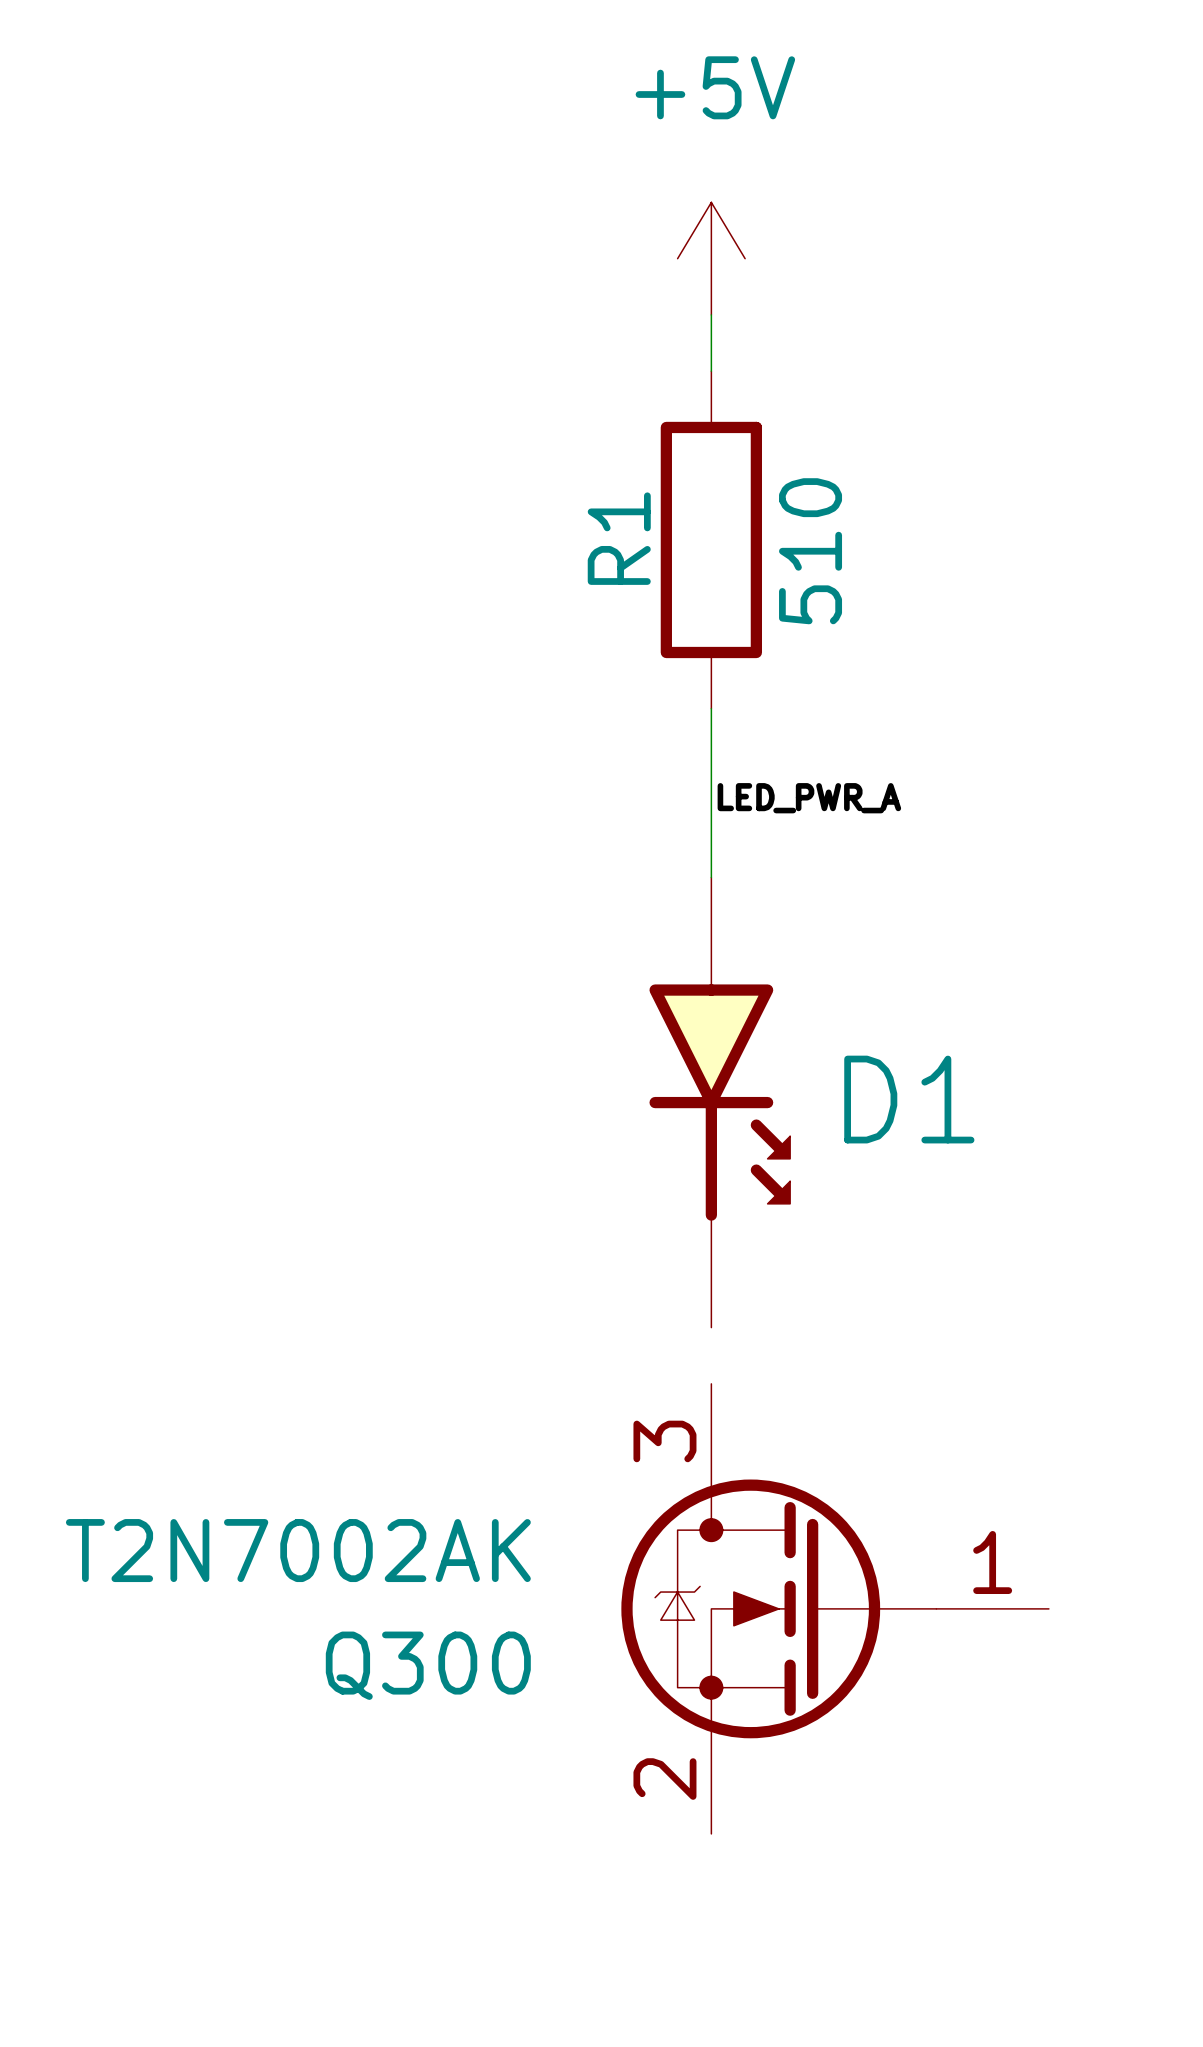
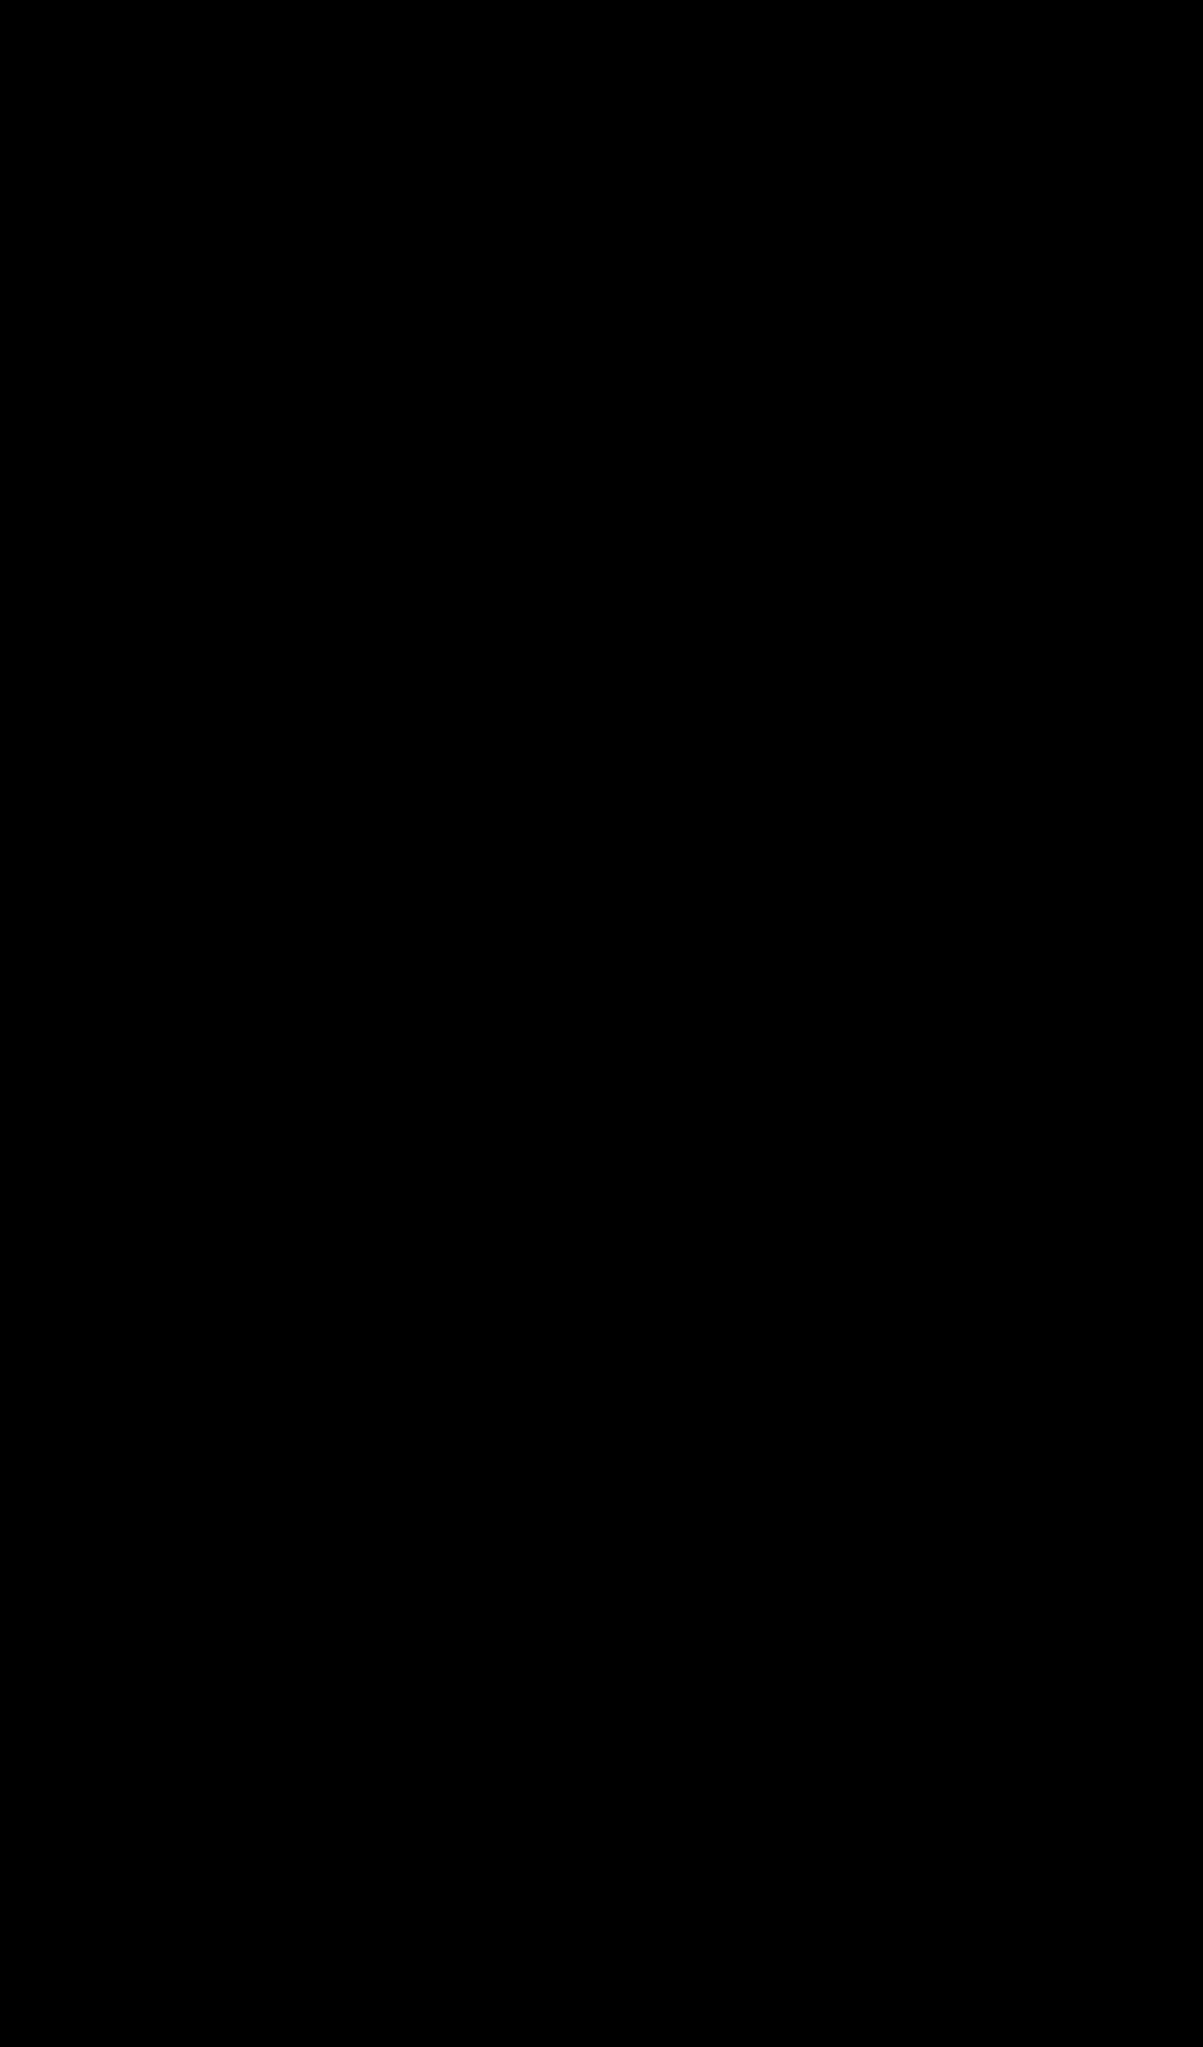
power symbol: +5V (711, 258) -> none
wire: (711, 314) (711, 371) -> none
R1: 510 (711, 539) -> none
wire: (711, 708) (711, 877) -> none
label: LED_PWR_A (809, 798) -> none
D1: (719, 1102) -> none
Q300: T2N7002AK (835, 1608) -> none

